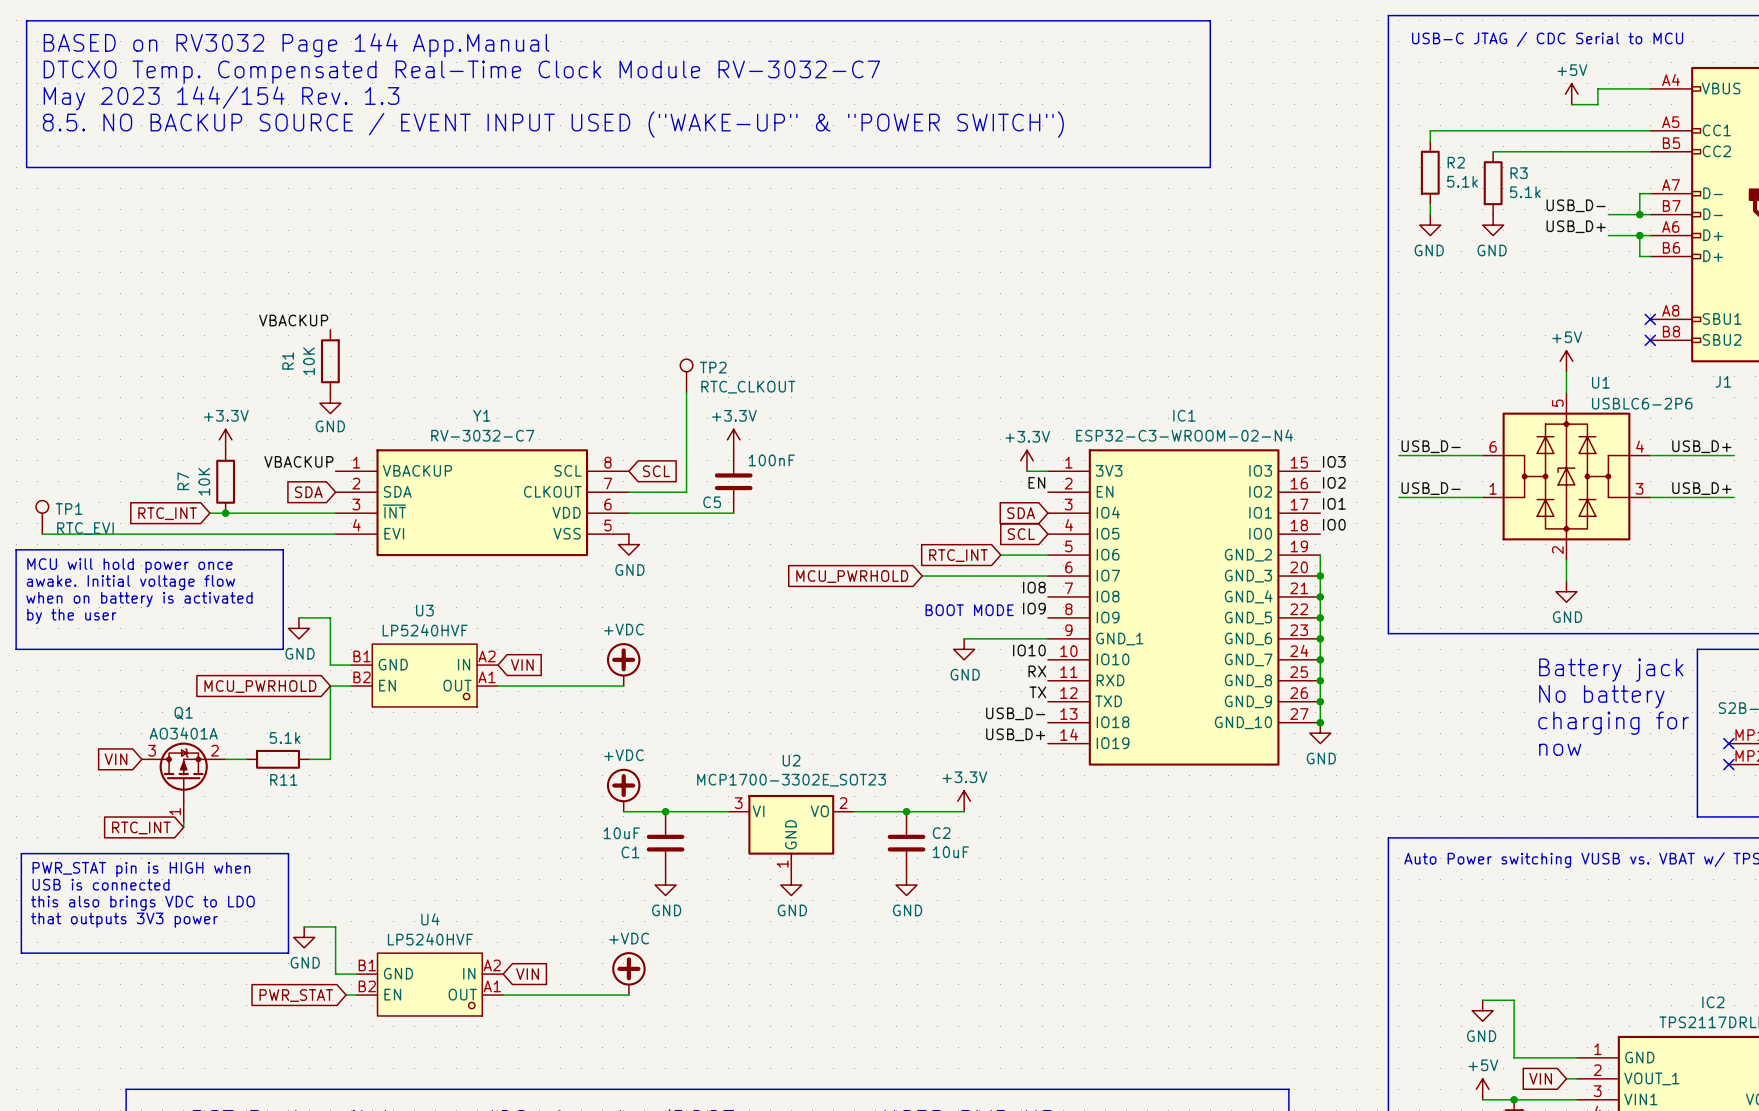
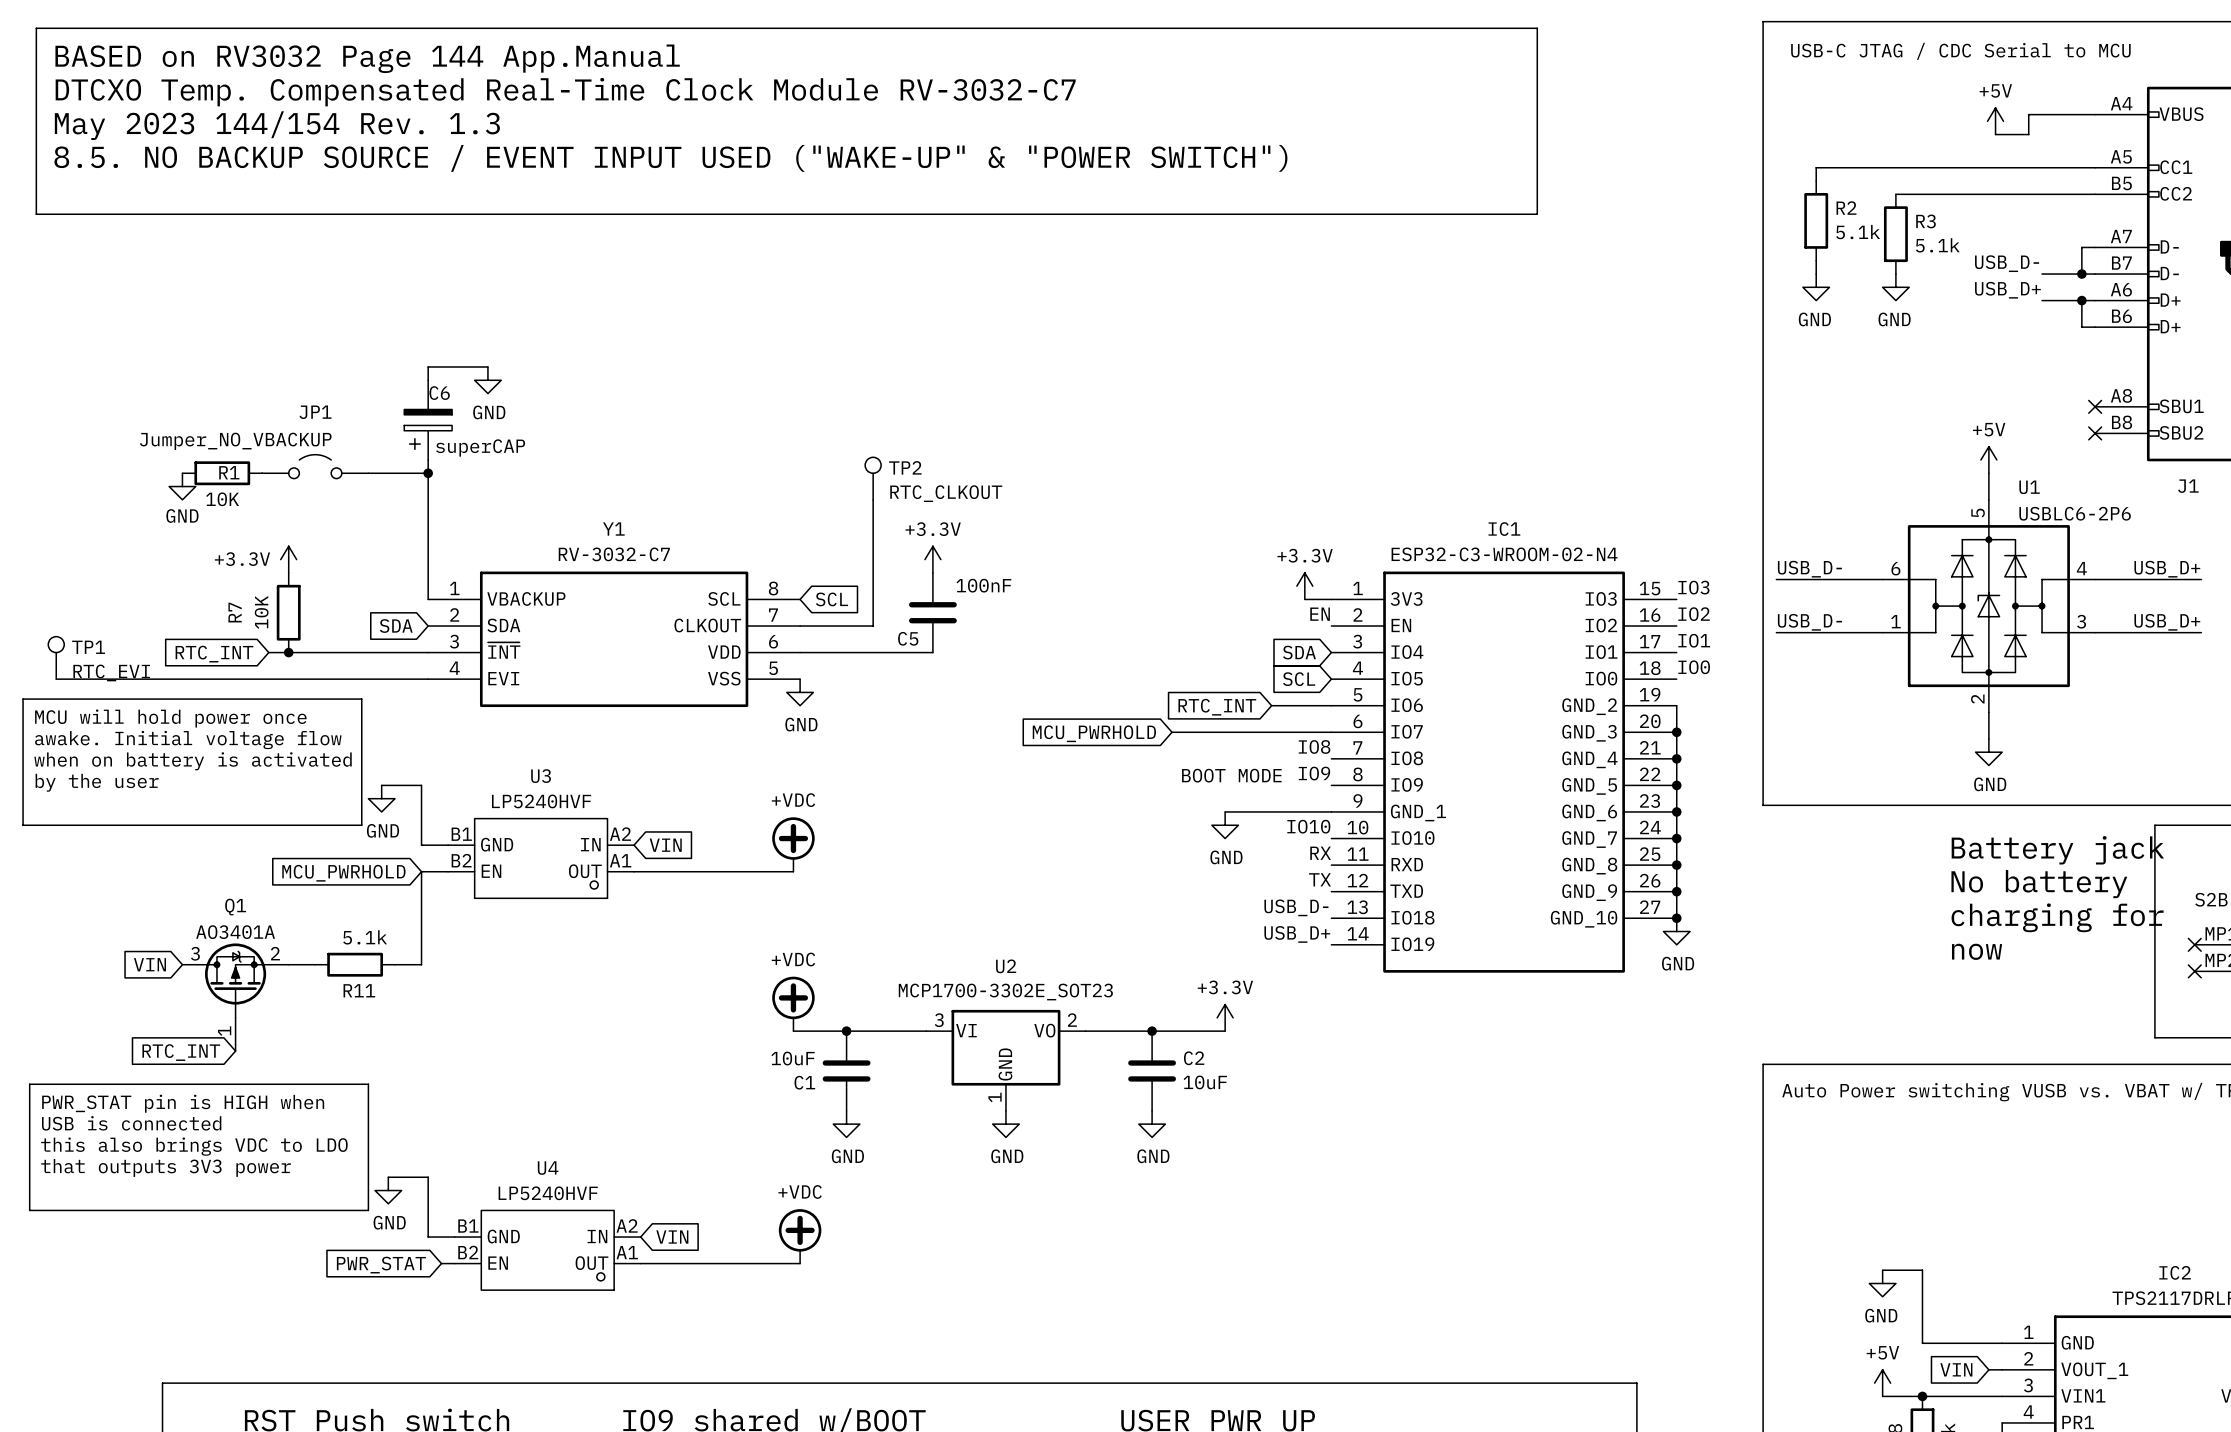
wire: none -> (487, 367) (428, 367) (428, 380)
power symbol: none -> GND (487, 380)
label: VBACKUP (293, 320) -> none
C6: none -> superCAP (428, 420)
R1 name position: R1 (288, 361) -> R1 (229, 472)
R1 value position: 10K (309, 361) -> 10K (222, 499)
R1 rotation: 0° (330, 361) -> 90° clockwise (222, 473)
R1 position: (330, 361) -> (222, 473)
wire: none -> (428, 459) (428, 599)
JP1: none -> Jumper_NO_VBACKUP (315, 466)
wire: none -> (368, 473) (428, 473)
junction: none -> (428, 473)
power symbol: none -> GND (182, 486)
power symbol: GND (330, 403) -> none
power symbol text position: +3.3V (226, 415) -> +3.3V (242, 559)
label: VBACKUP (298, 461) -> none

